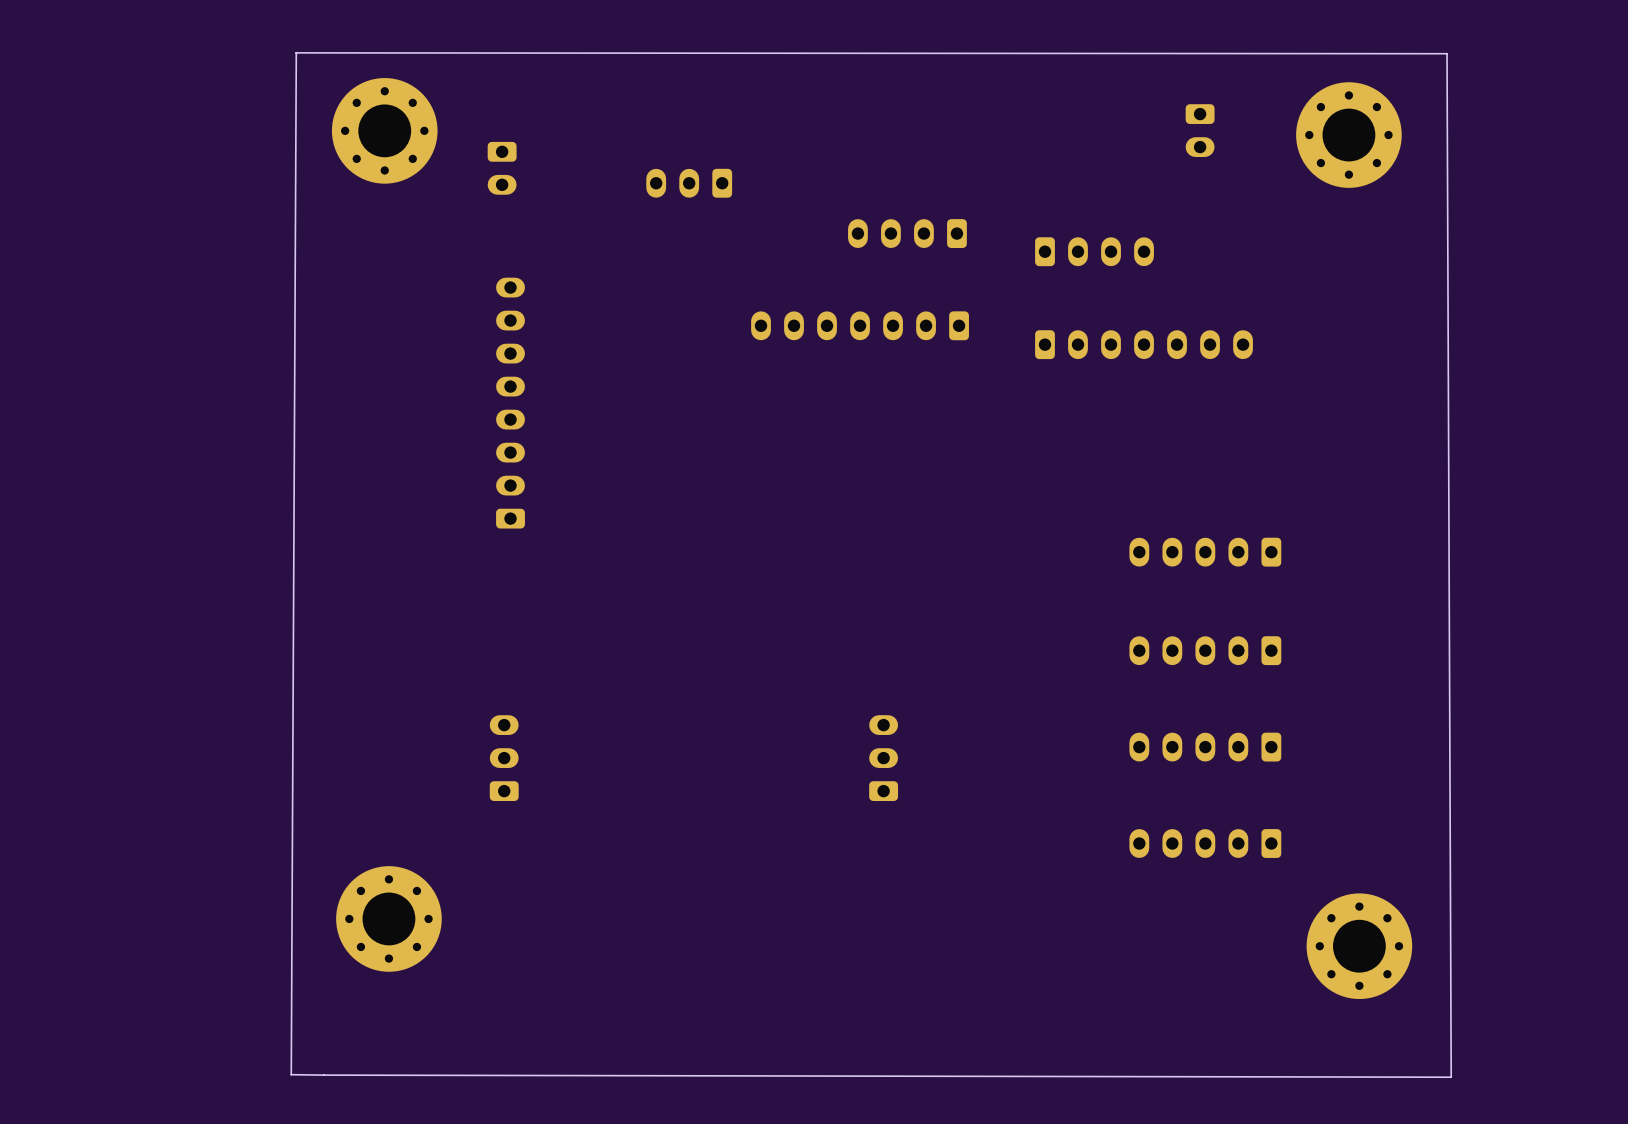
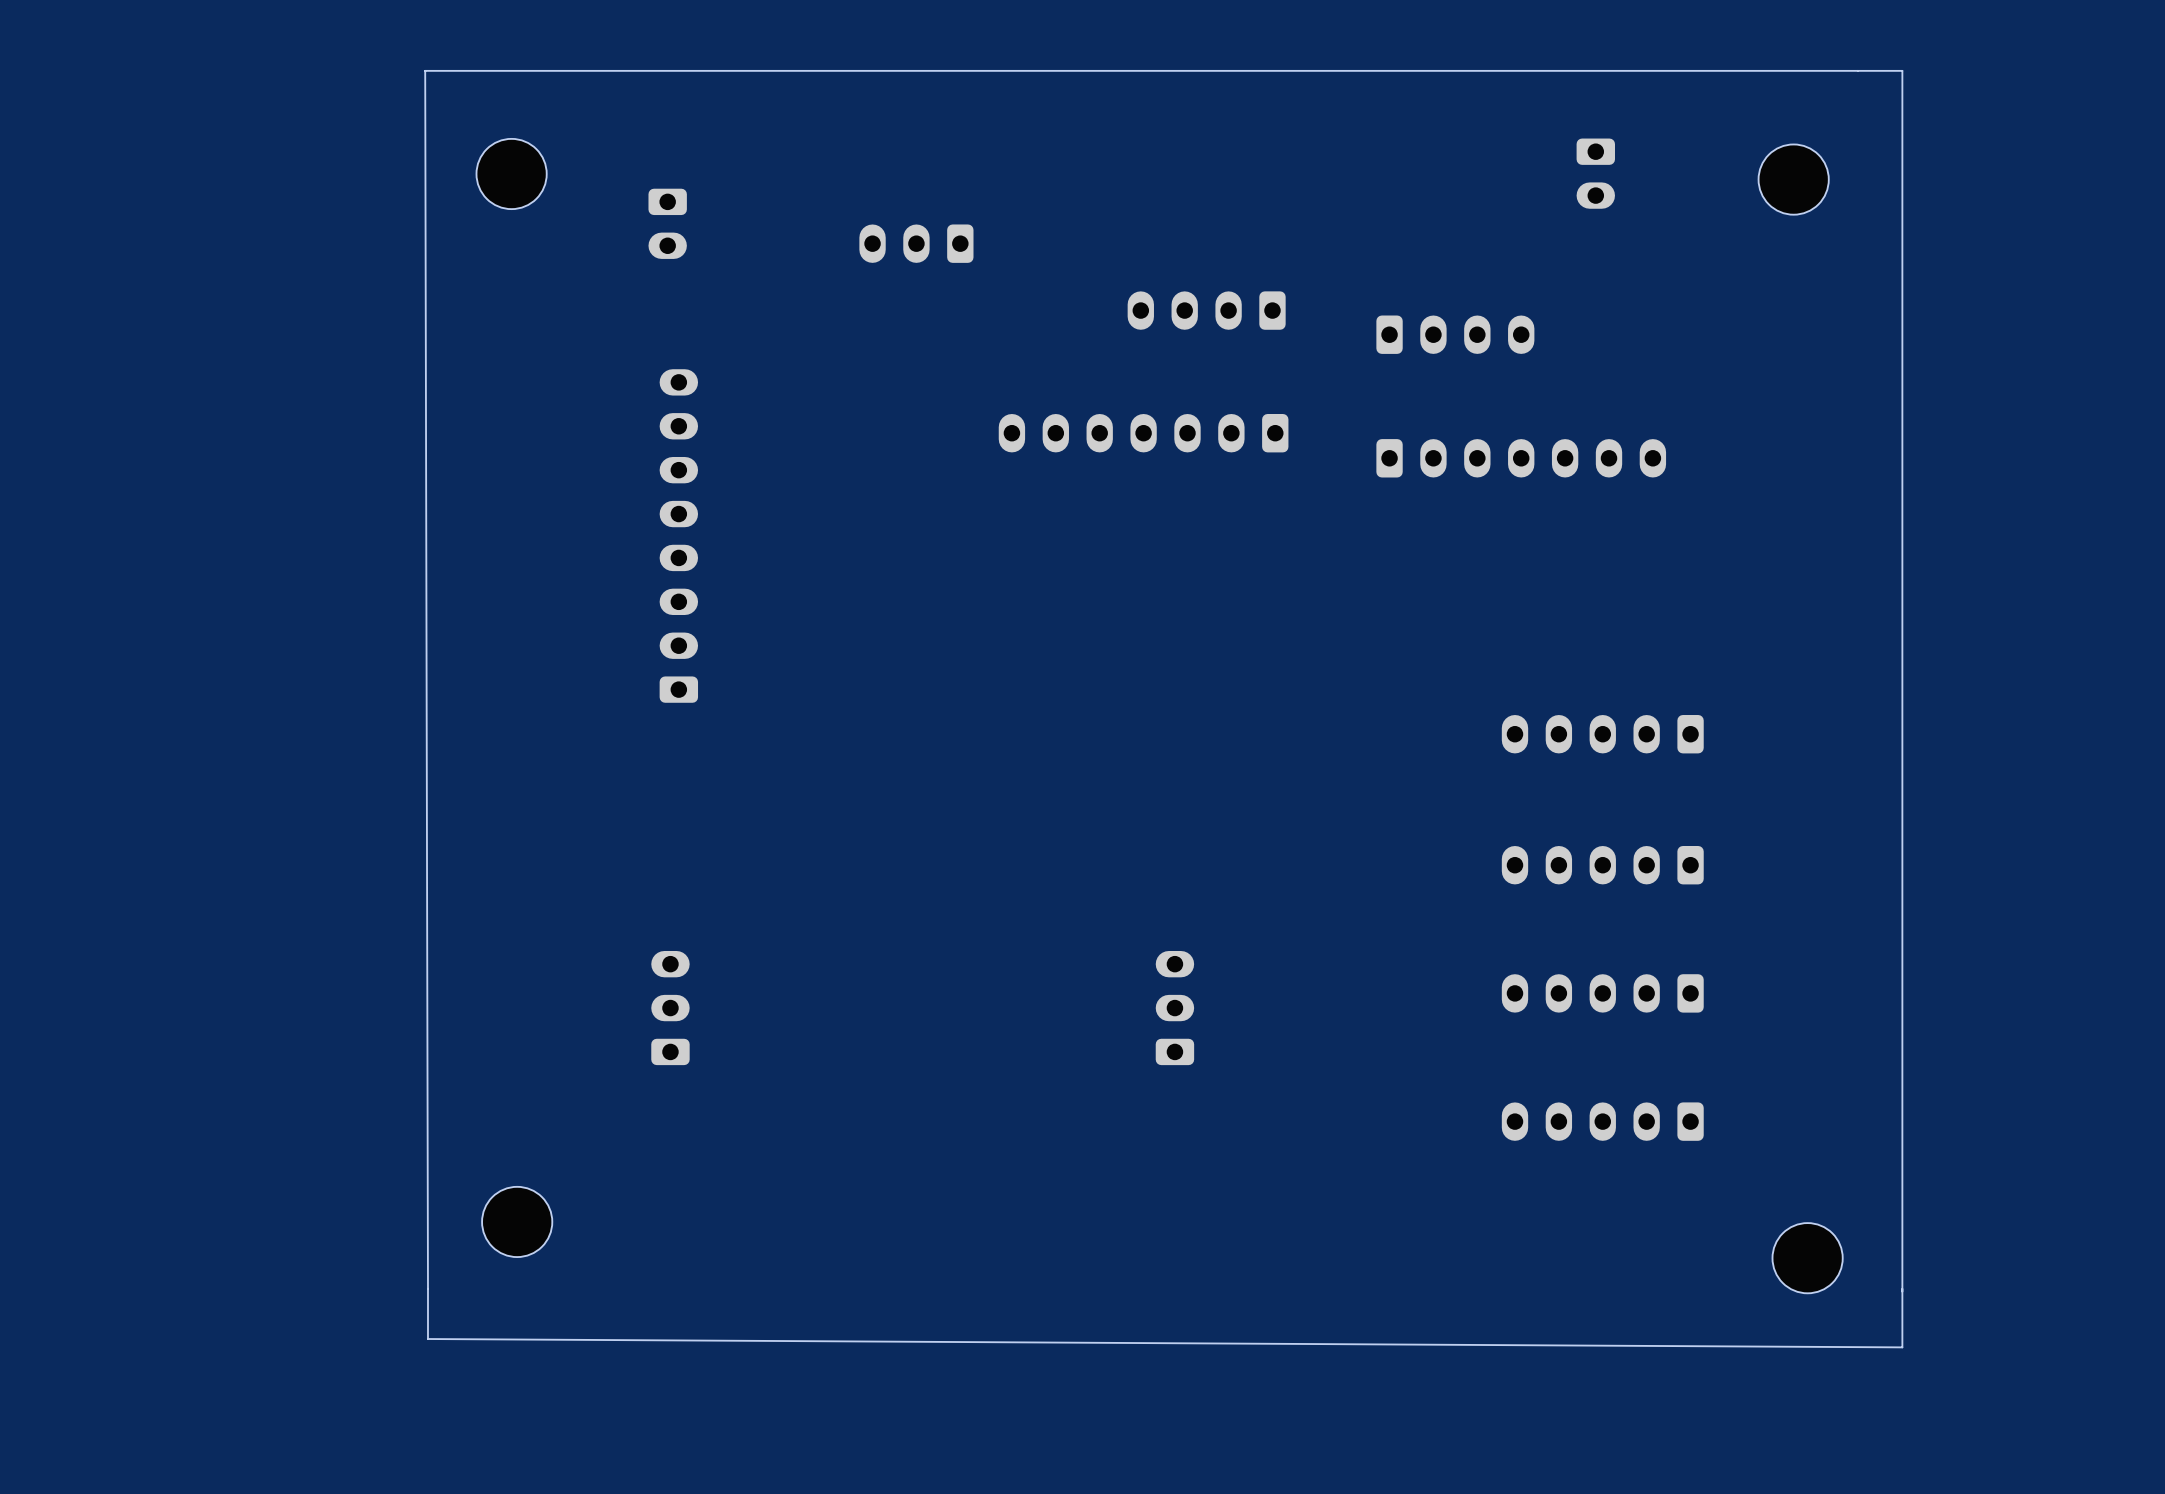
board edge: (296, 52) (1447, 53) (1451, 1077) (291, 1074) (296, 53) -> (1902, 70) (1902, 1347) (427, 1339) (425, 70) (1902, 70)
part footprint: [331, 78, 438, 184] -> [476, 138, 547, 210]
part footprint: [1296, 82, 1402, 188] -> [1758, 144, 1829, 215]
part footprint: [336, 866, 442, 972] -> [482, 1186, 553, 1258]
part footprint: [1306, 893, 1413, 1000] -> [1772, 1223, 1843, 1294]

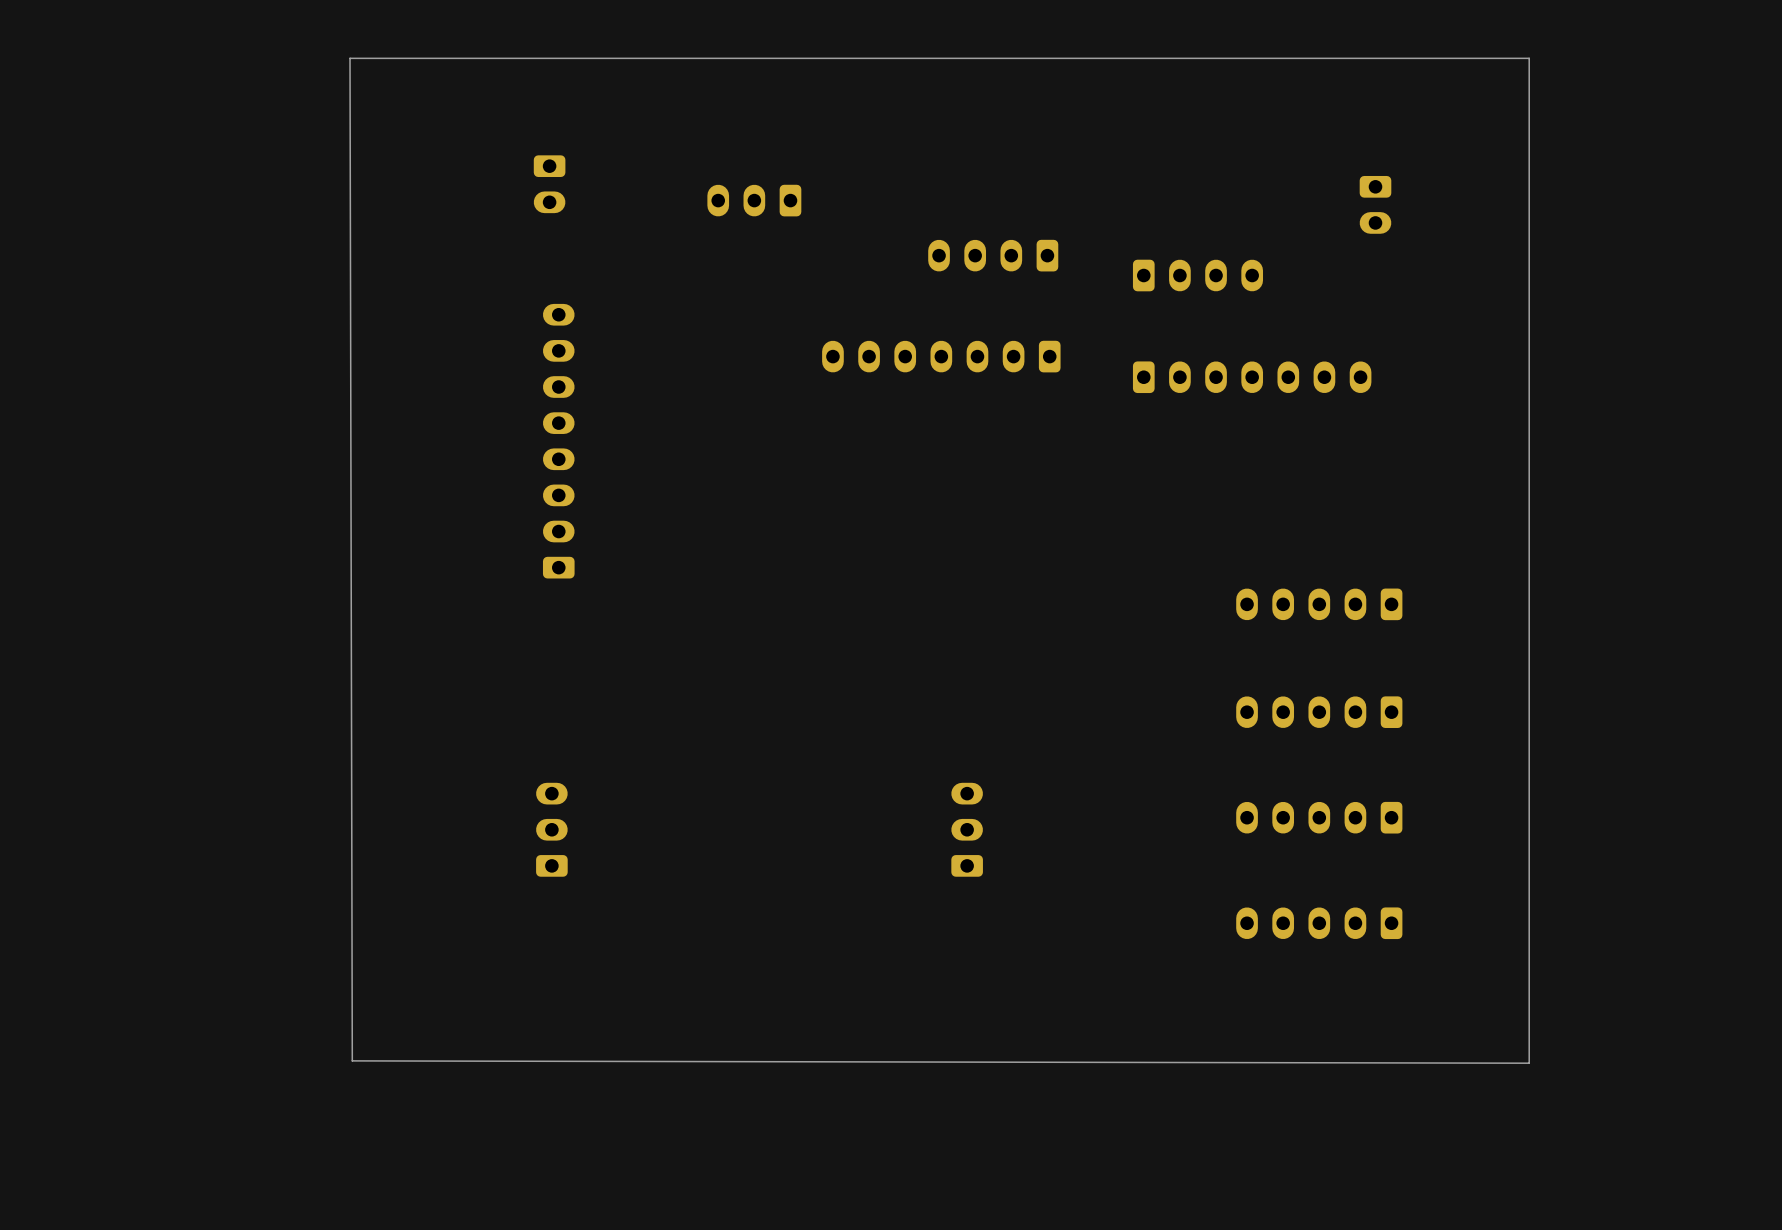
board edge: (1857, 70) (1902, 70) (1902, 1347) (427, 1339) (427, 1288) -> (1529, 58) (1529, 1063) (352, 1060)
part position: (1595, 173) -> (1375, 204)
part: (511, 174) -> none
part: (1793, 179) -> none
part: (517, 1221) -> none
part: (1807, 1258) -> none

